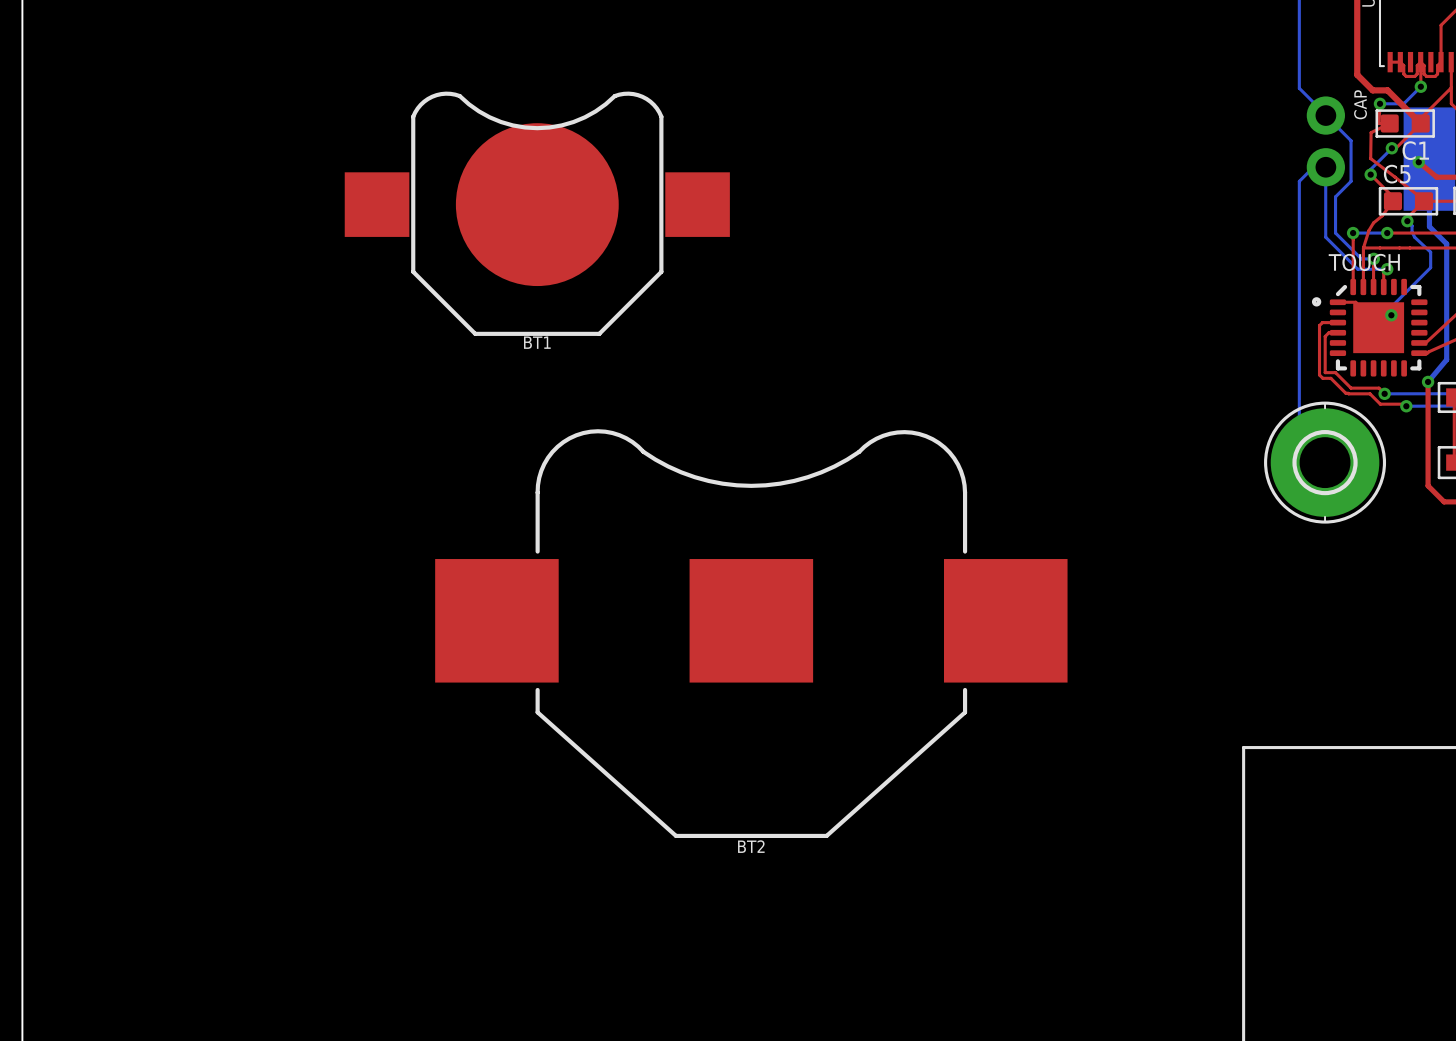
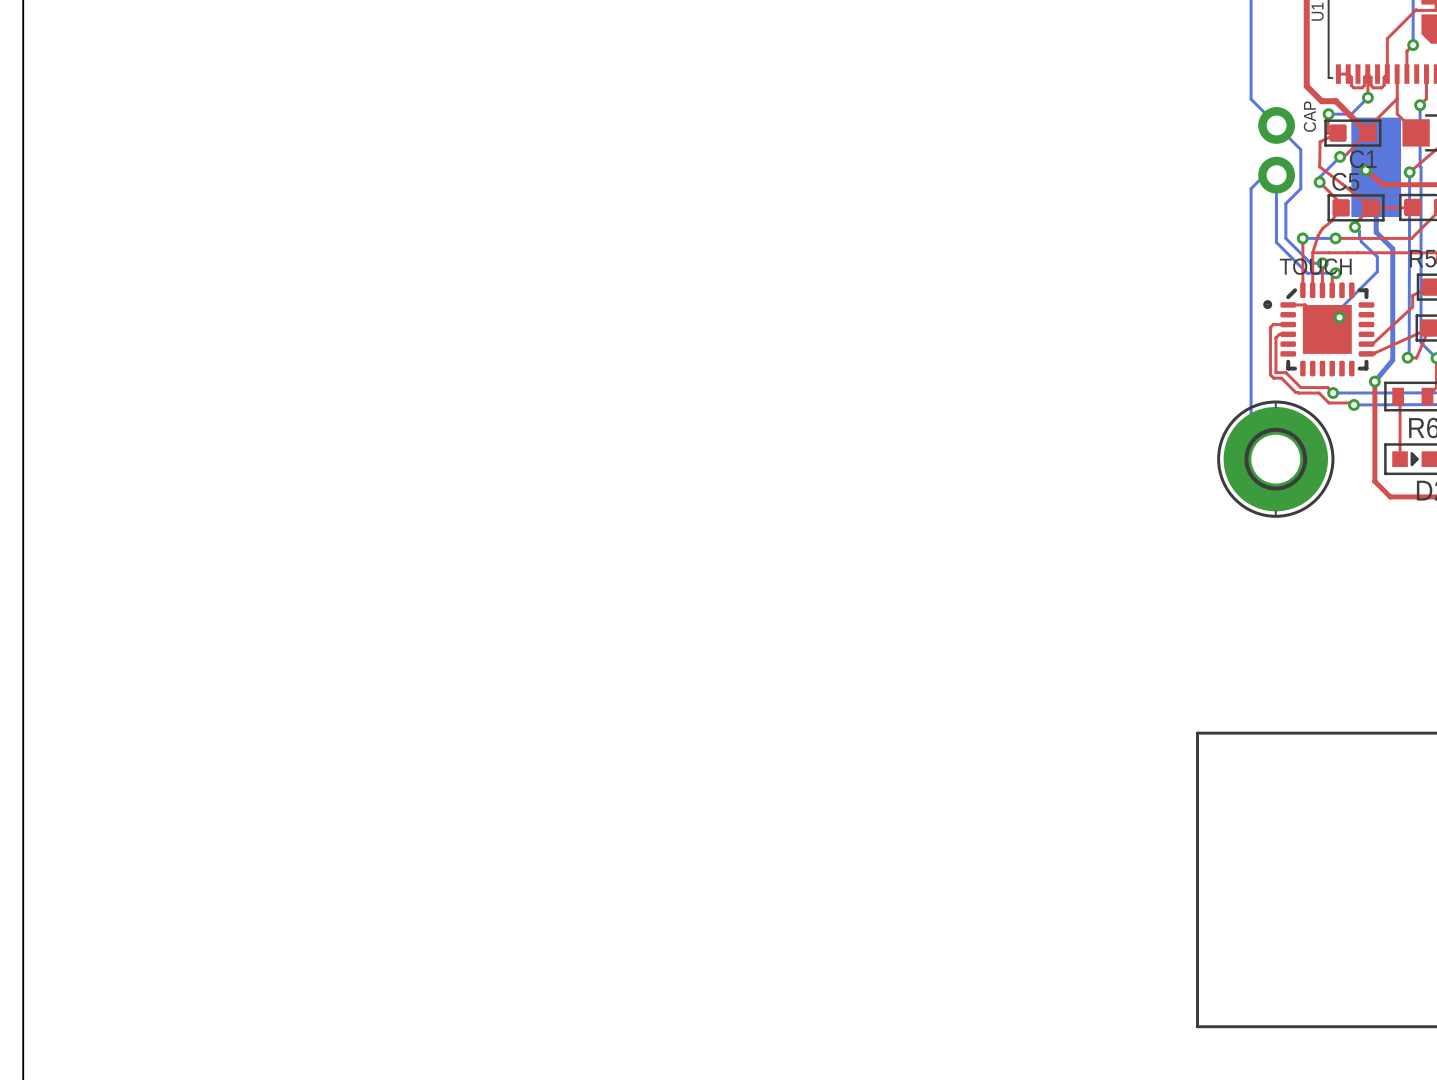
BT1: (537, 213) -> none
BT2: (751, 633) -> none

